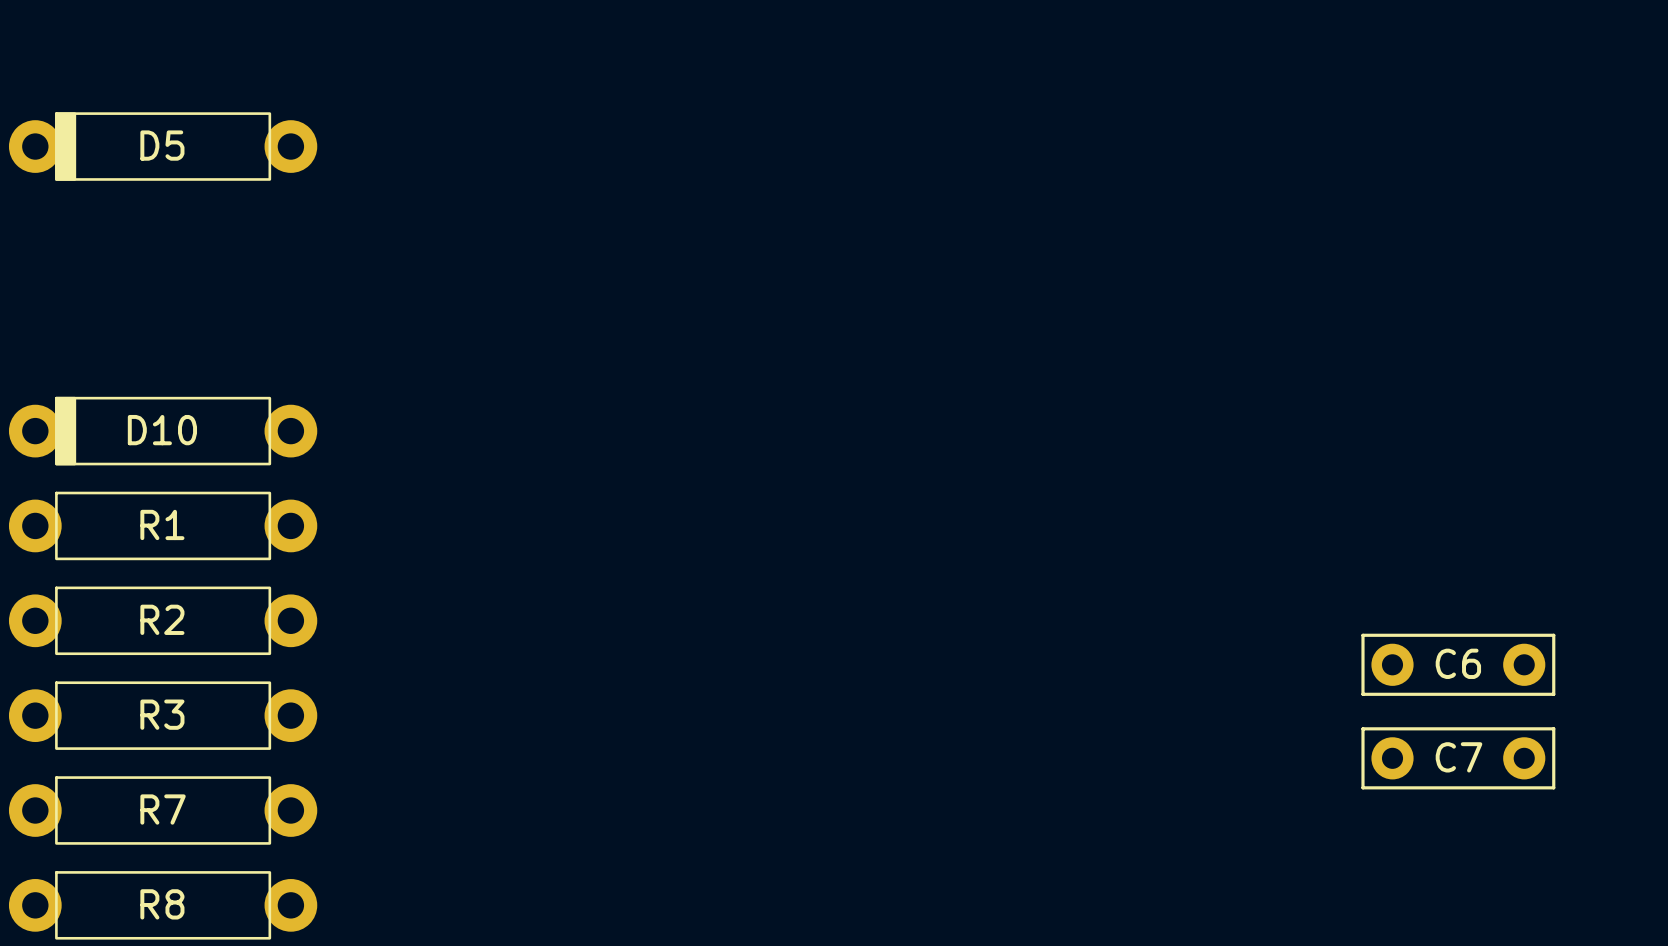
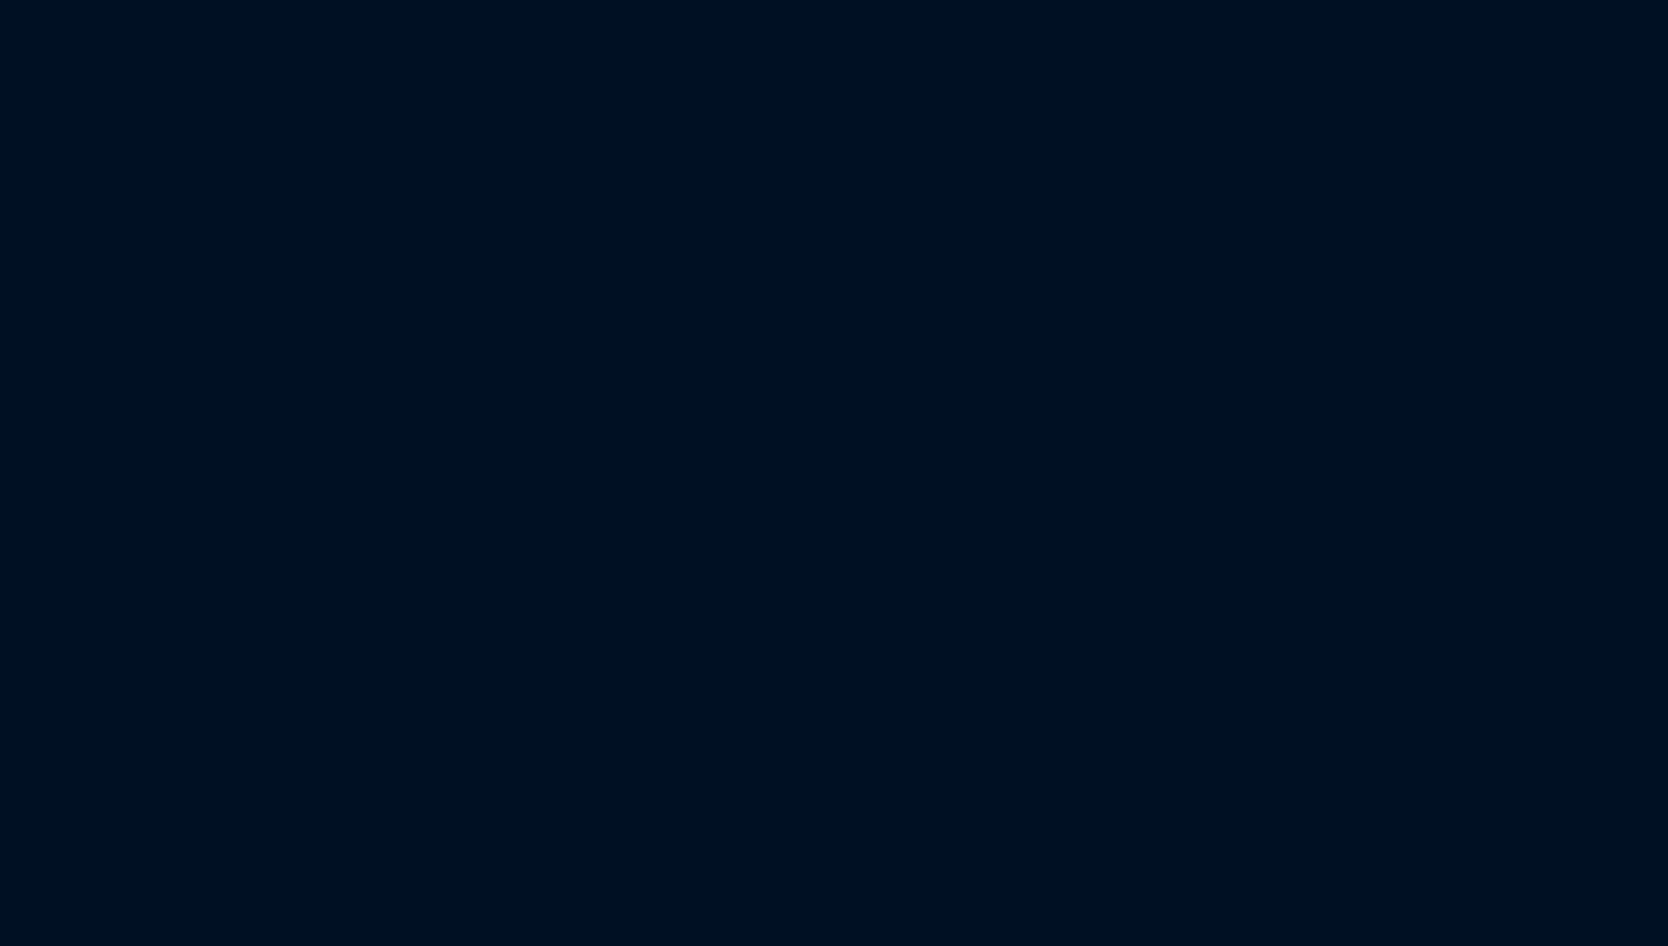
D5: (163, 146) -> none
D10: (163, 431) -> none
R1: (163, 525) -> none
R2: (163, 620) -> none
C6: (1458, 664) -> none
R3: (163, 715) -> none
C7: (1458, 758) -> none
R7: (163, 810) -> none
R8: (163, 905) -> none

